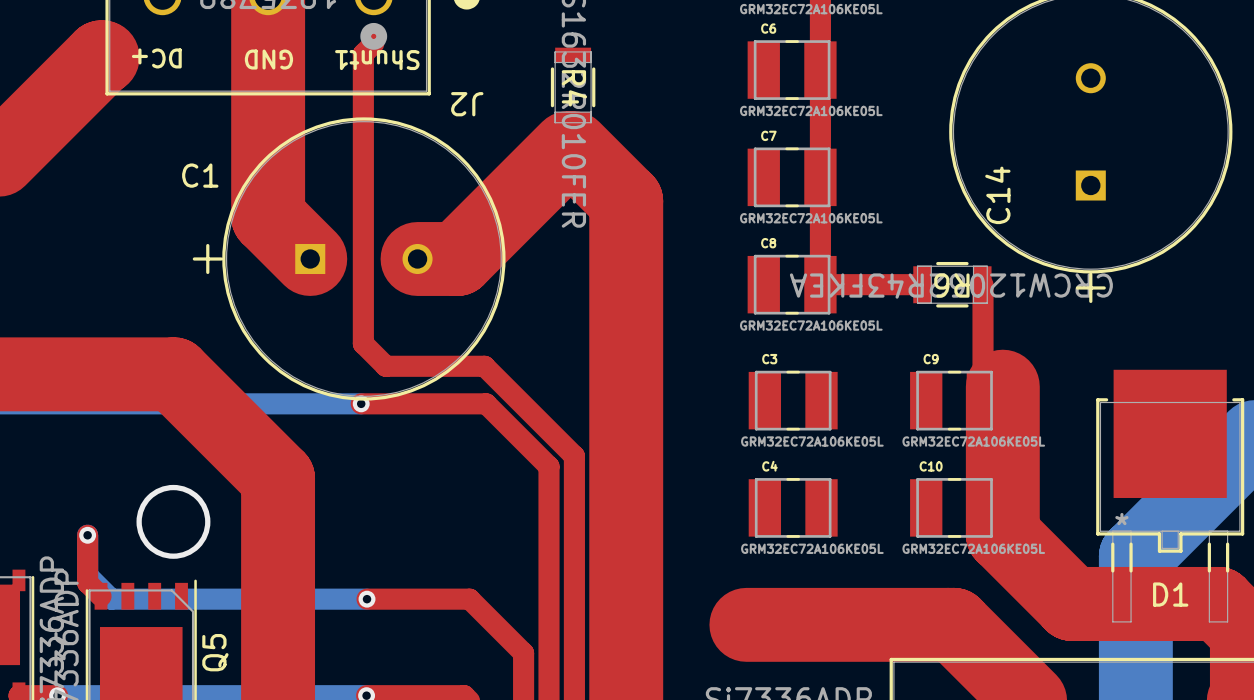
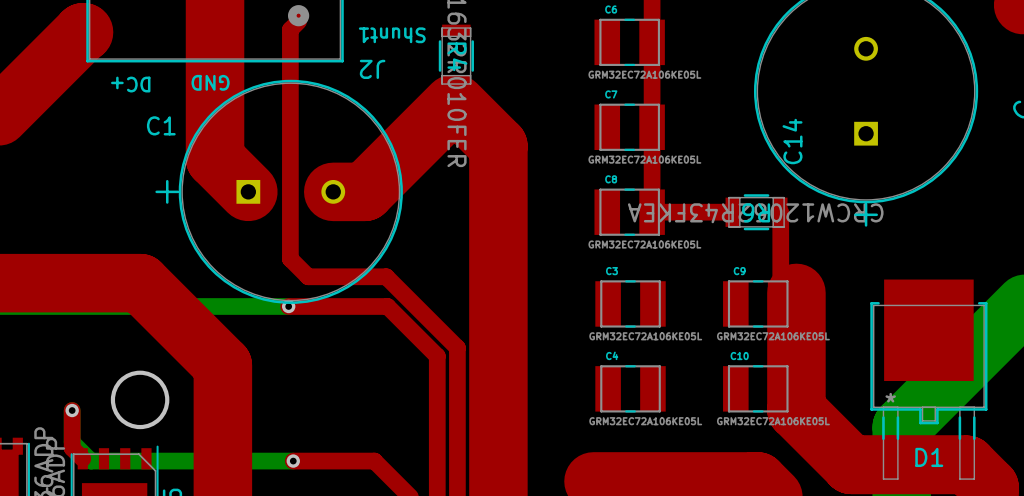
text position: DC+ (156, 58) -> DC+ (130, 84)
text position: GND (268, 59) -> GND (210, 82)
text position: Shunt1 (377, 60) -> Shunt1 (392, 35)

